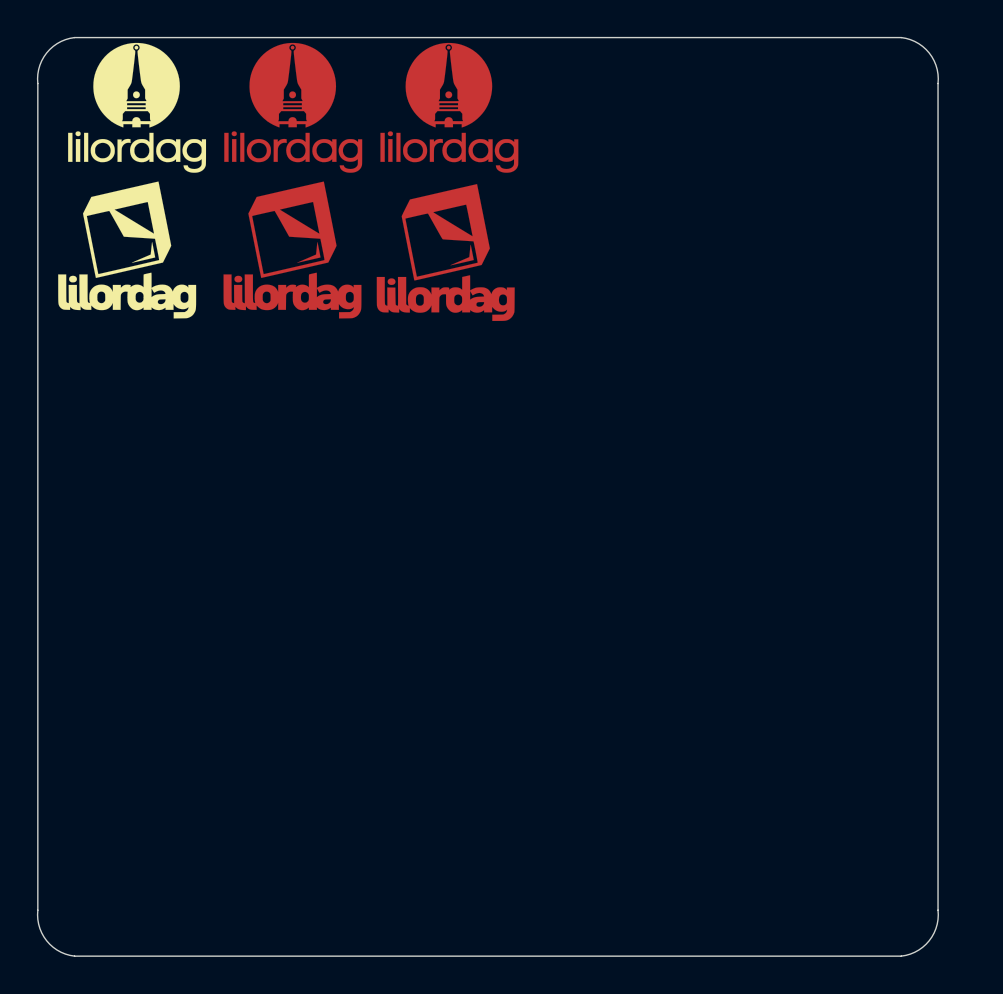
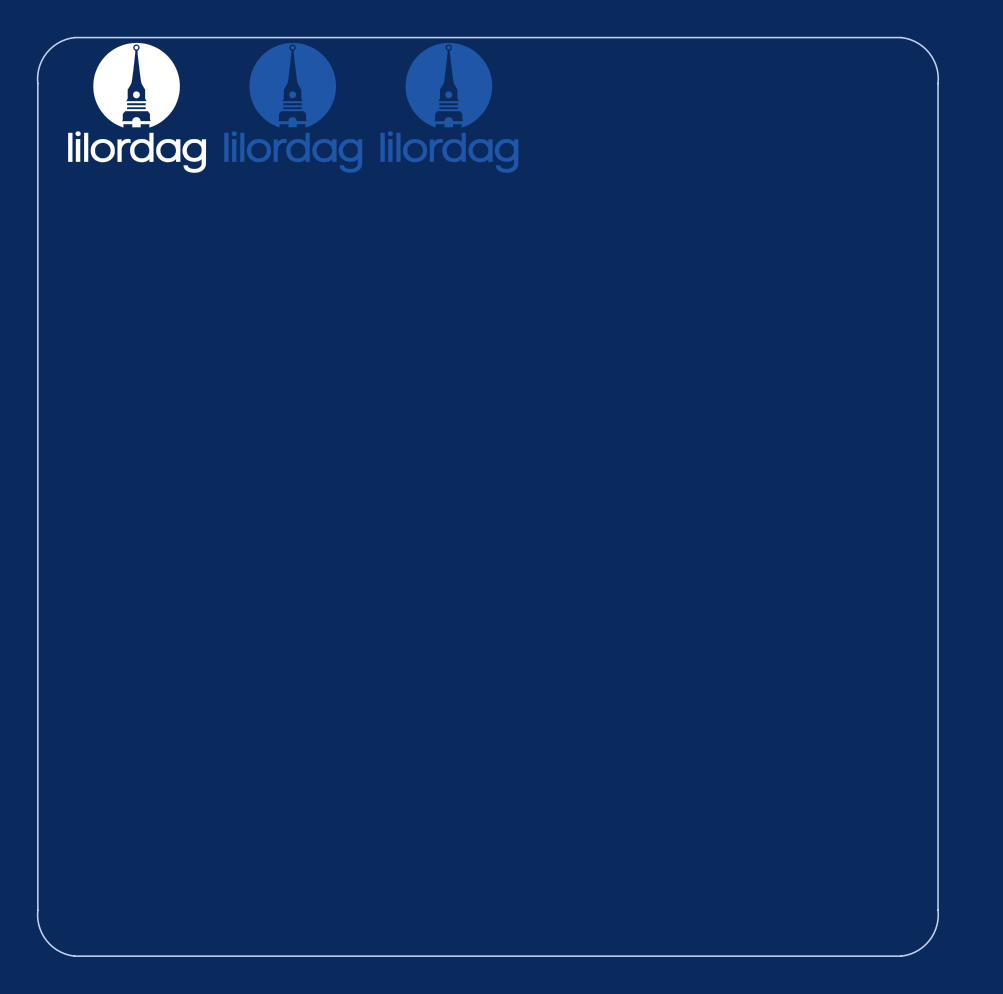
drawing: [58, 181, 197, 319] -> none
drawing: [223, 181, 362, 319] -> none
drawing: [376, 184, 515, 321] -> none

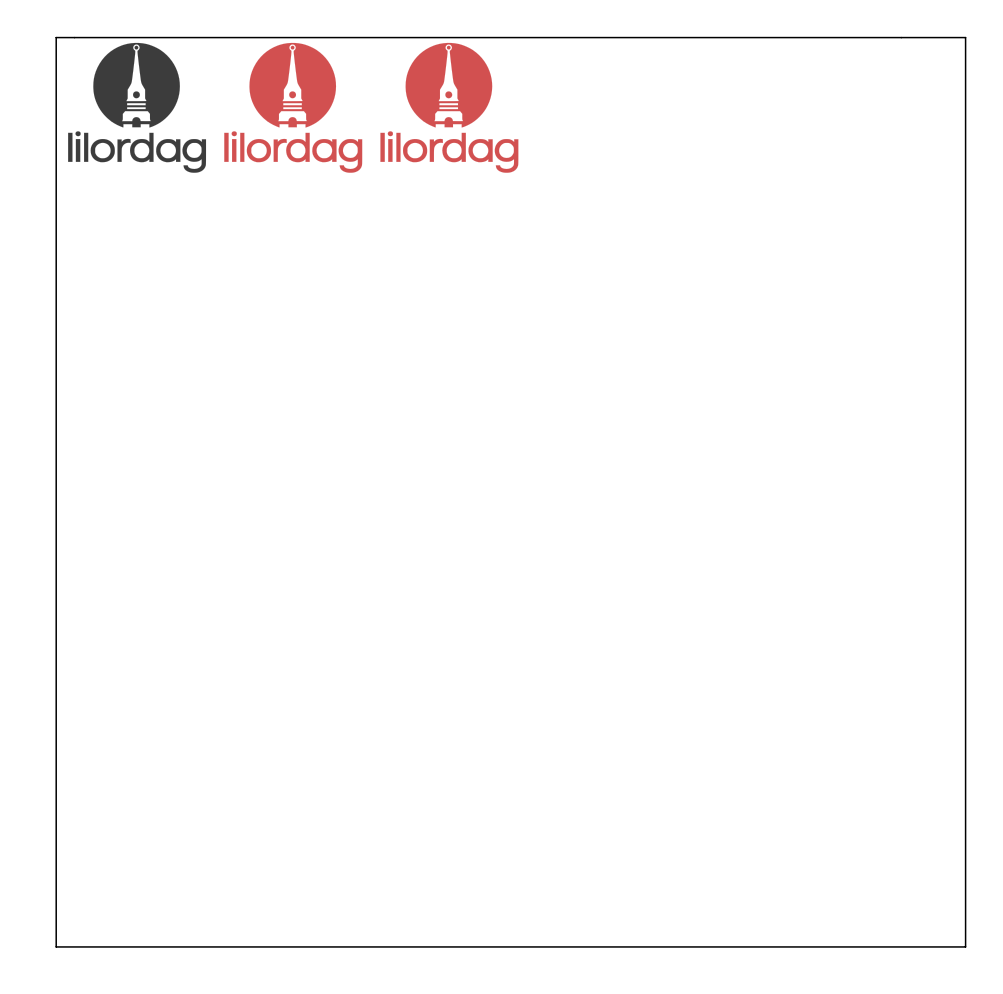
board edge: (74, 37) (57, 43) (46, 52) (39, 65) (37, 78) (37, 914) (41, 932) (49, 944) (61, 952) (74, 956) (901, 956) (914, 952) (926, 944) (935, 928) (938, 914) (938, 78) (935, 65) (929, 52) (914, 41) (901, 37) -> (74, 37) (56, 37) (56, 946) (965, 946) (965, 37) (901, 37)

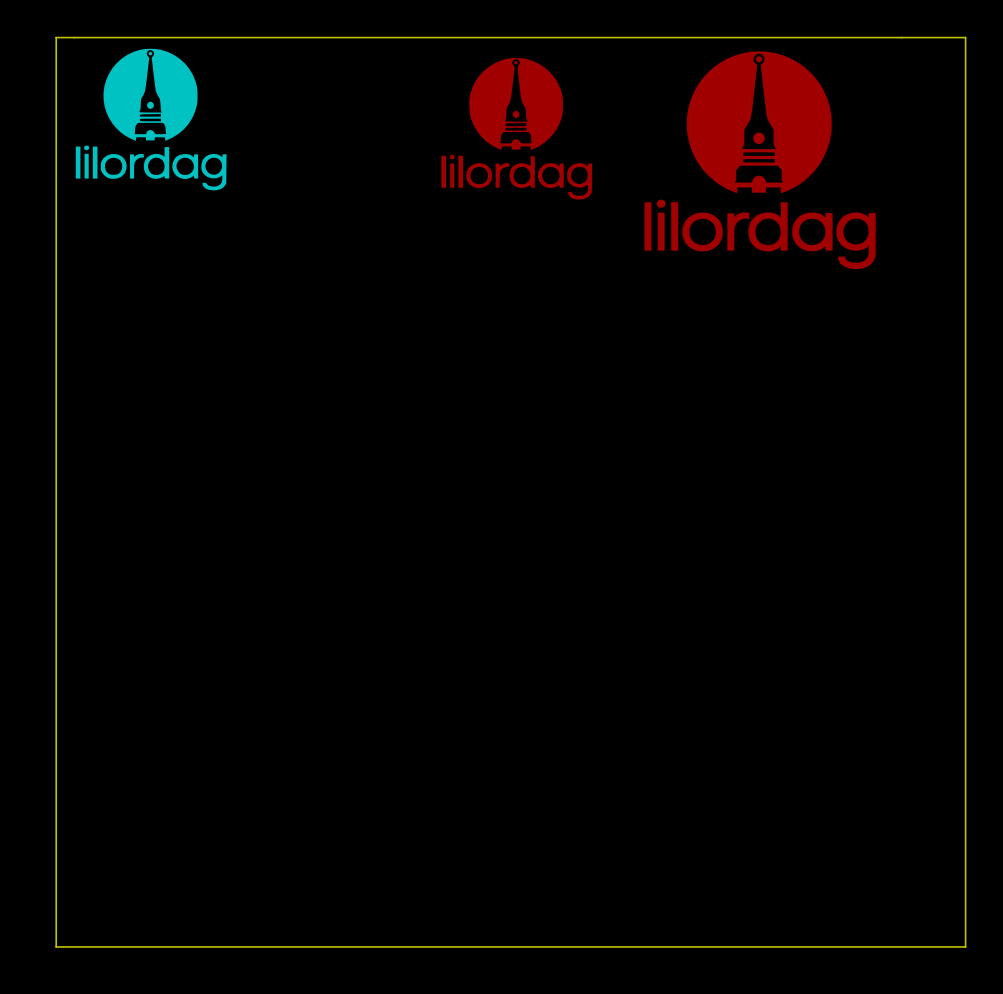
drawing: [68, 42, 207, 173] -> none
drawing: [224, 42, 363, 173] -> none
drawing: [380, 42, 519, 173] -> none
drawing: none -> [75, 48, 227, 191]
drawing: none -> [644, 51, 876, 270]
drawing: none -> [441, 58, 593, 200]

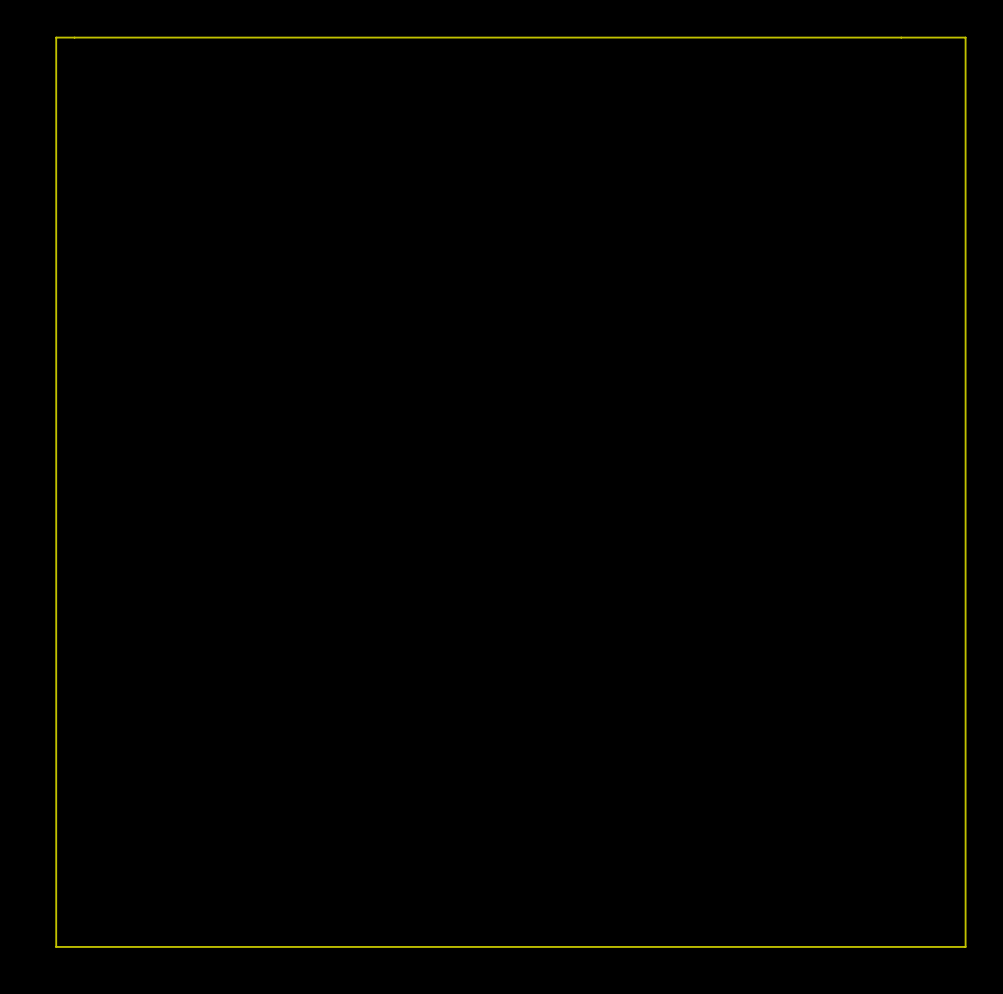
drawing: [75, 48, 227, 191] -> none
drawing: [644, 51, 876, 270] -> none
drawing: [441, 58, 593, 200] -> none

